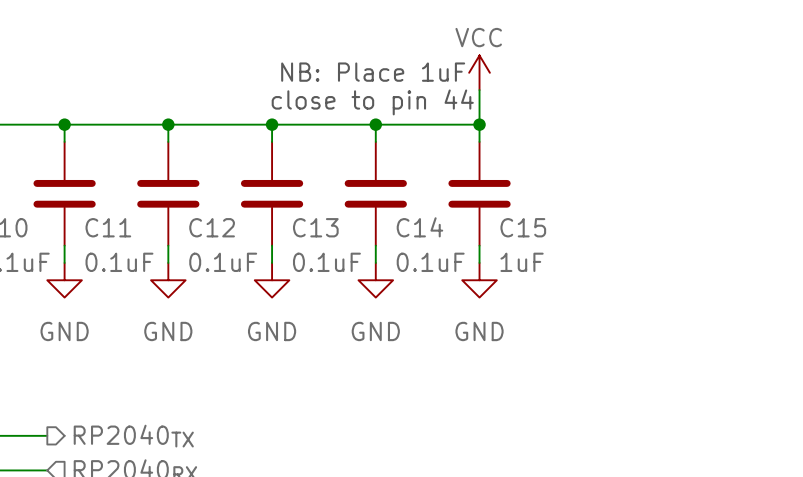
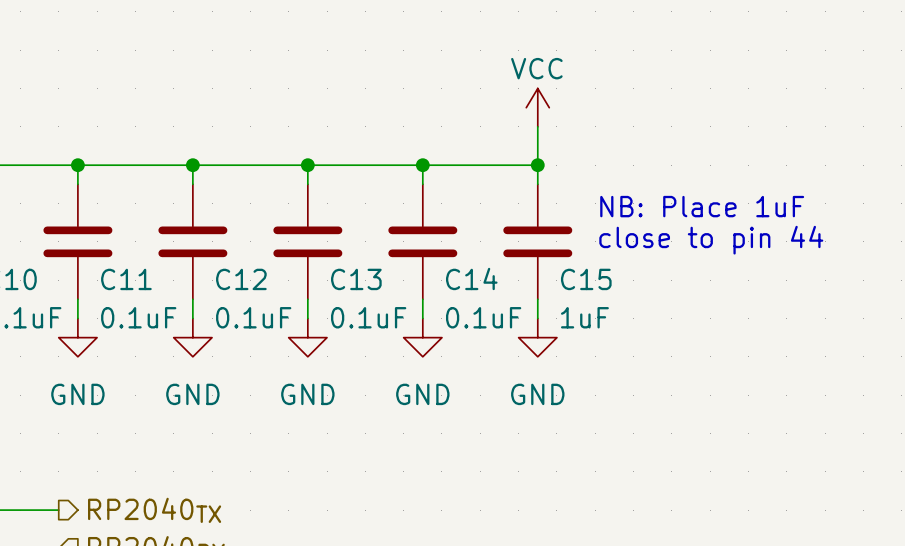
text position: NB: Place 1uF (373, 72) -> NB: Place 1uF (702, 206)
text position: close to pin 44 (372, 102) -> close to pin 44 (711, 240)

